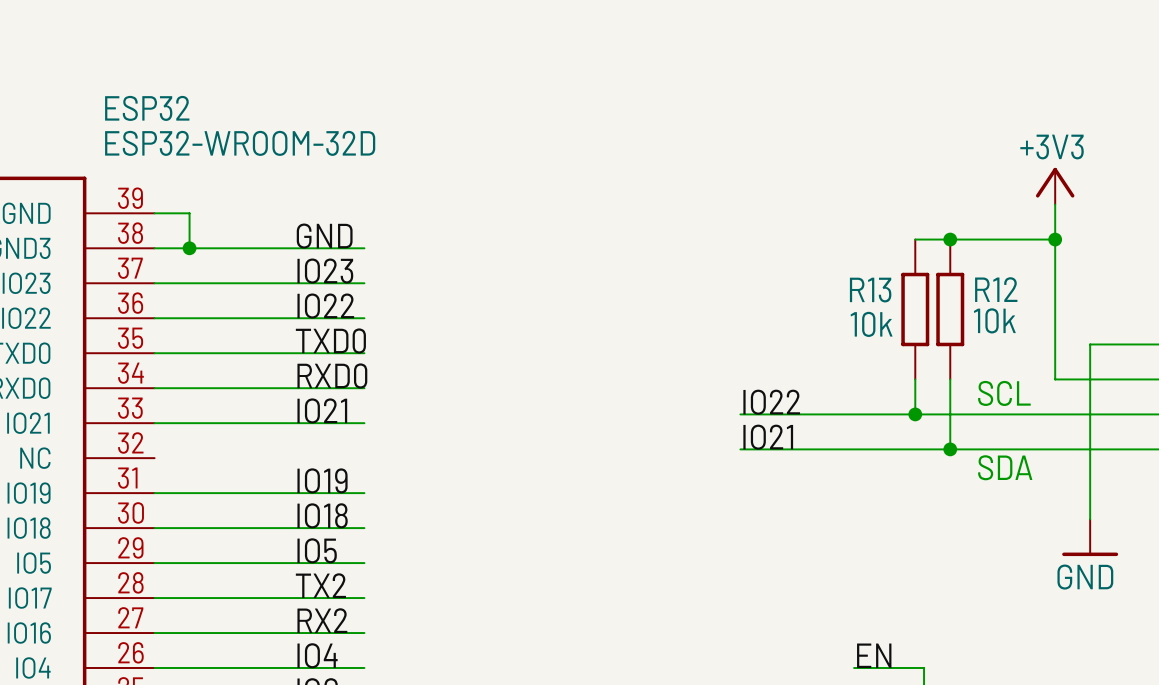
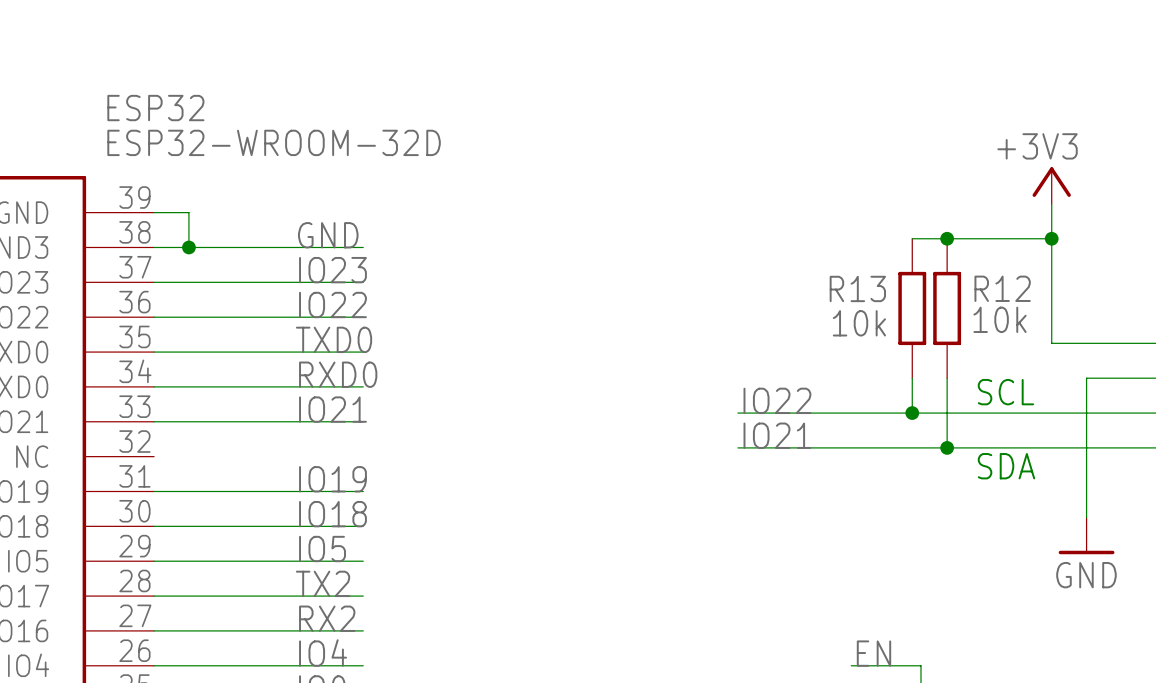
wire: (1055, 344) (1055, 379) (1090, 379) (1090, 344) -> (1051, 343) (1086, 343)

